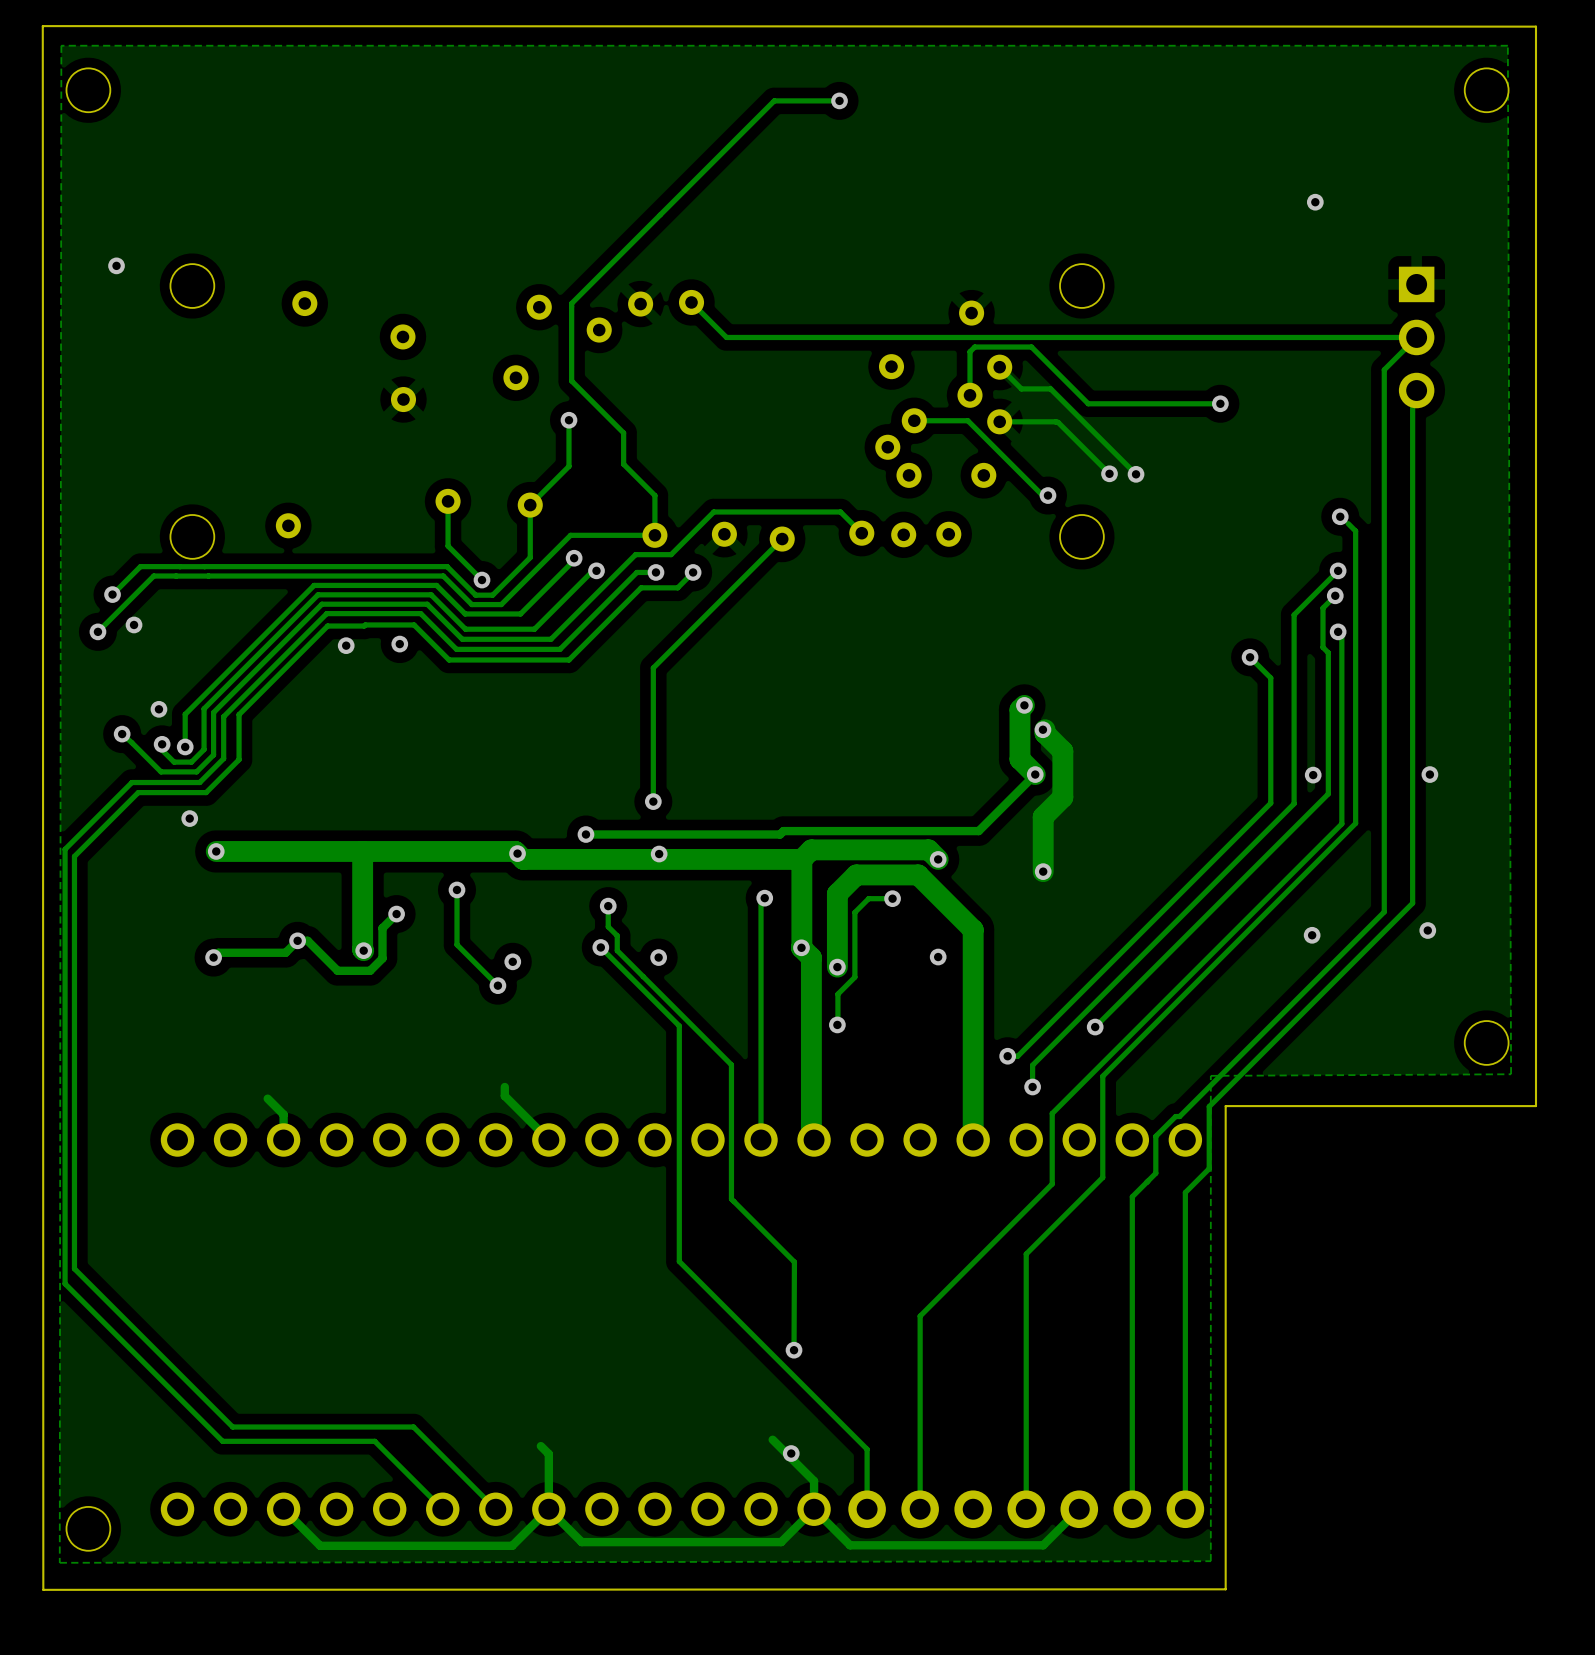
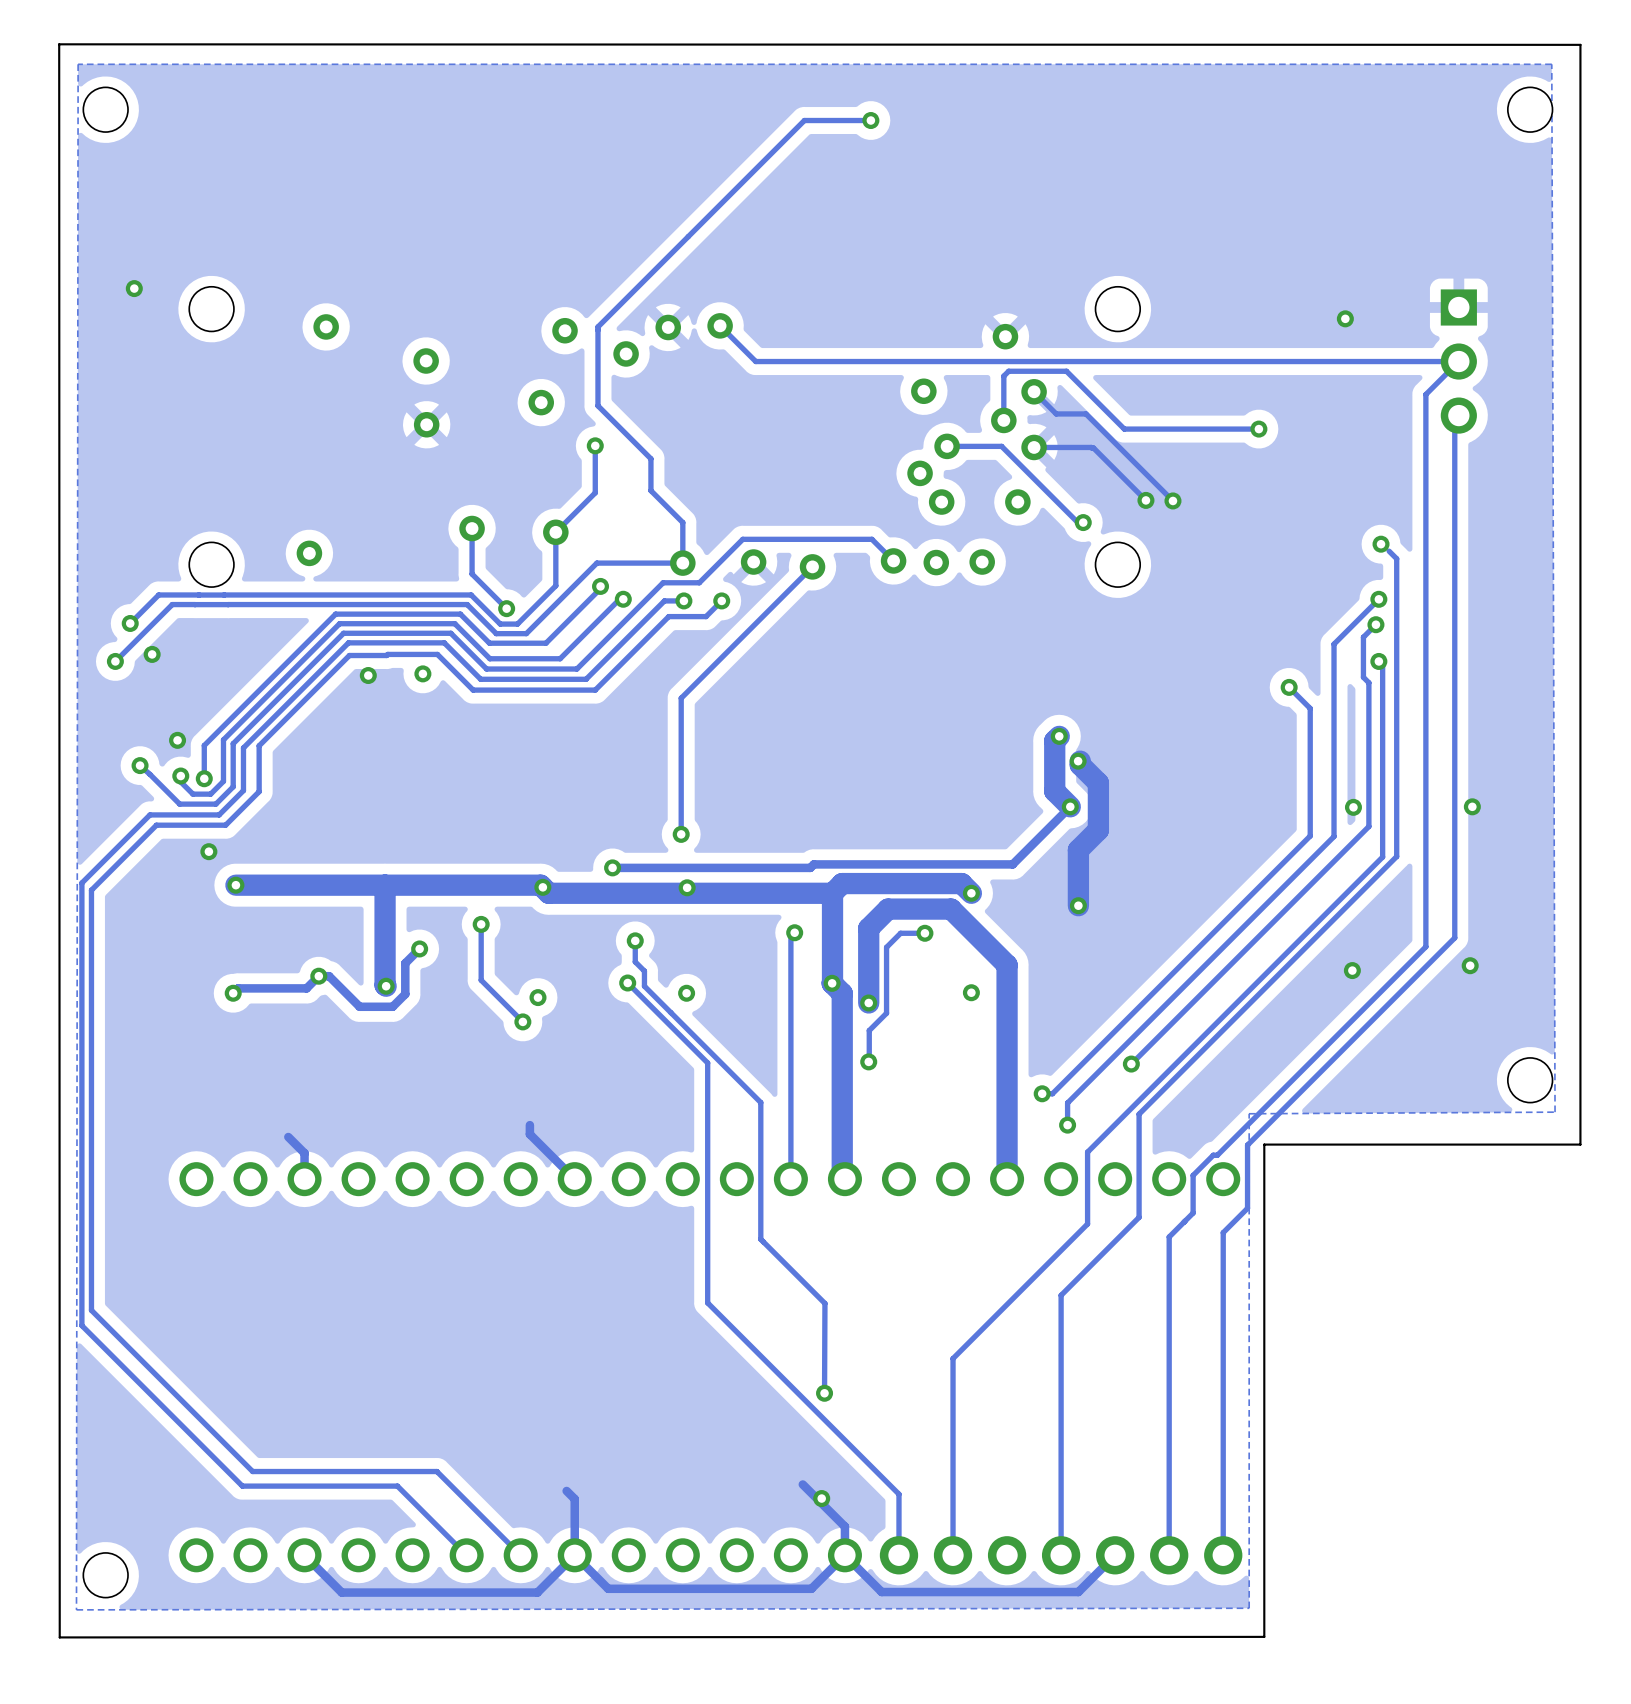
via position: (1315, 202) -> (1345, 318)

